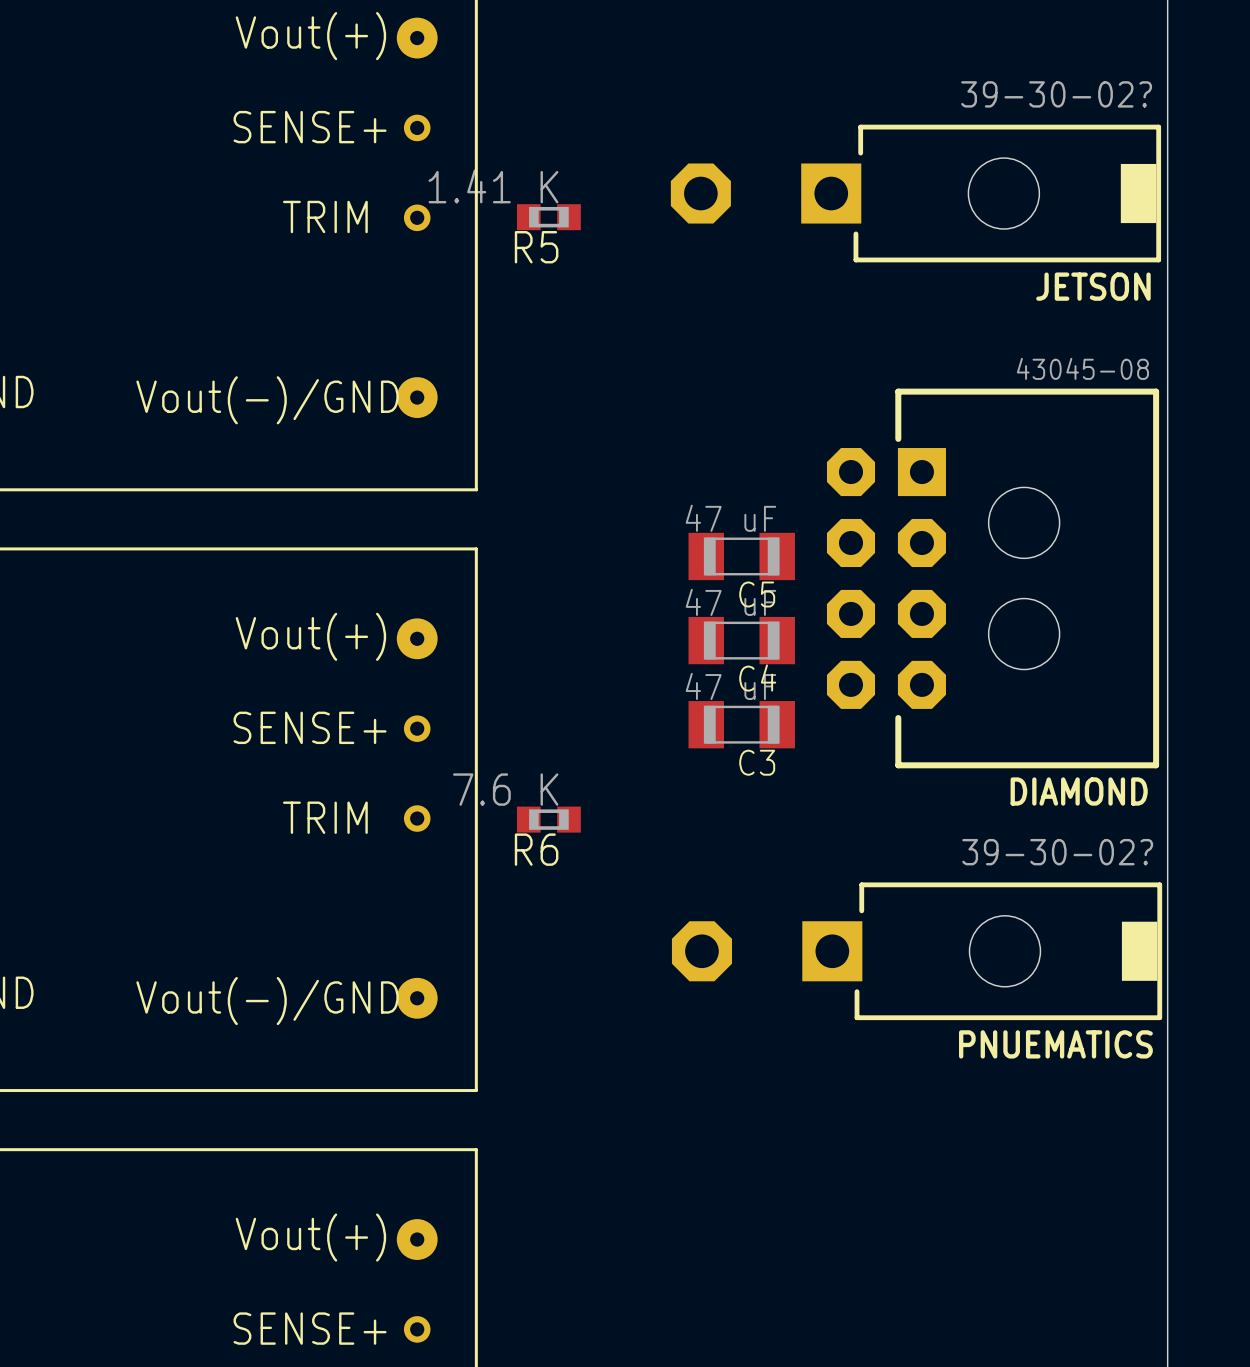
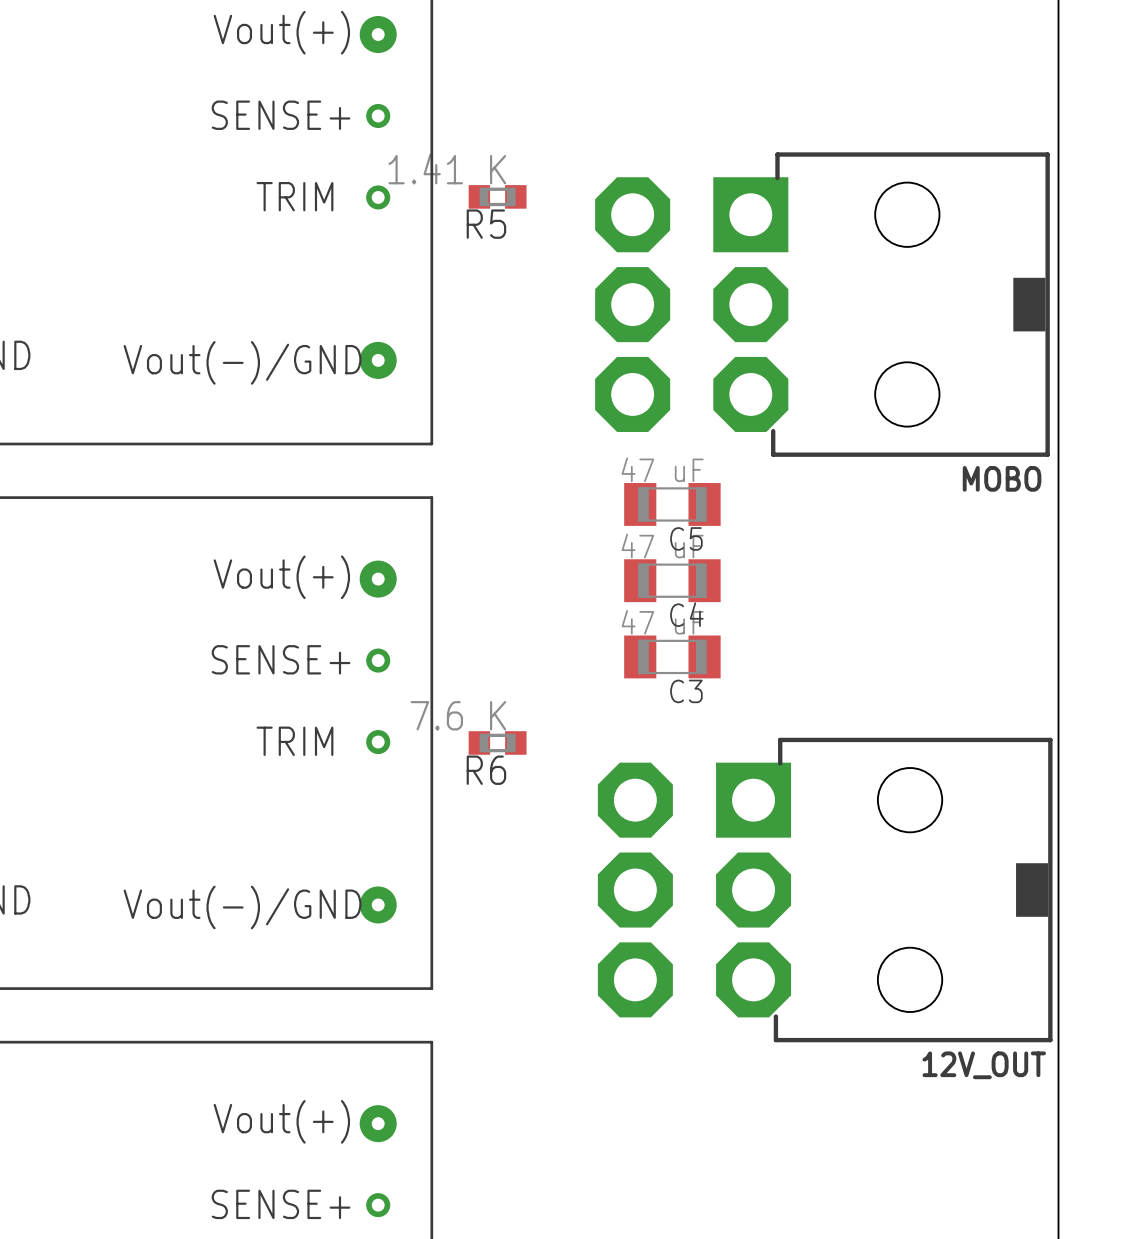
JETSON: 39-30-02? (915, 193) -> none
MOBO: none -> (822, 304)
DIAMOND: 43045-08 (993, 578) -> none
PNUEMATICS: 39-30-02? (917, 951) -> none
12V_OUT: none -> (825, 890)

